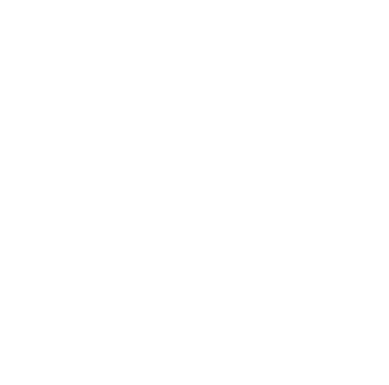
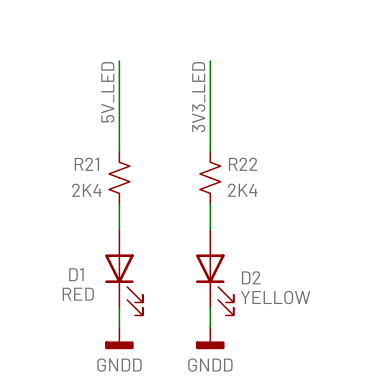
wire: none -> (119, 60) (119, 151)
wire: none -> (210, 60) (210, 151)
label: none -> 5V_LED (107, 92)
label: none -> 3V3_LED (198, 97)
R21: none -> 2K4 (119, 177)
R22: none -> 2K4 (210, 177)
wire: none -> (119, 203) (119, 229)
wire: none -> (210, 203) (210, 229)
D1: none -> RED (123, 272)
D2: none -> YELLOW (214, 272)
wire: none -> (119, 307) (119, 327)
wire: none -> (210, 307) (210, 327)
power symbol: none -> GNDD (119, 338)
power symbol: none -> GNDD (210, 338)

